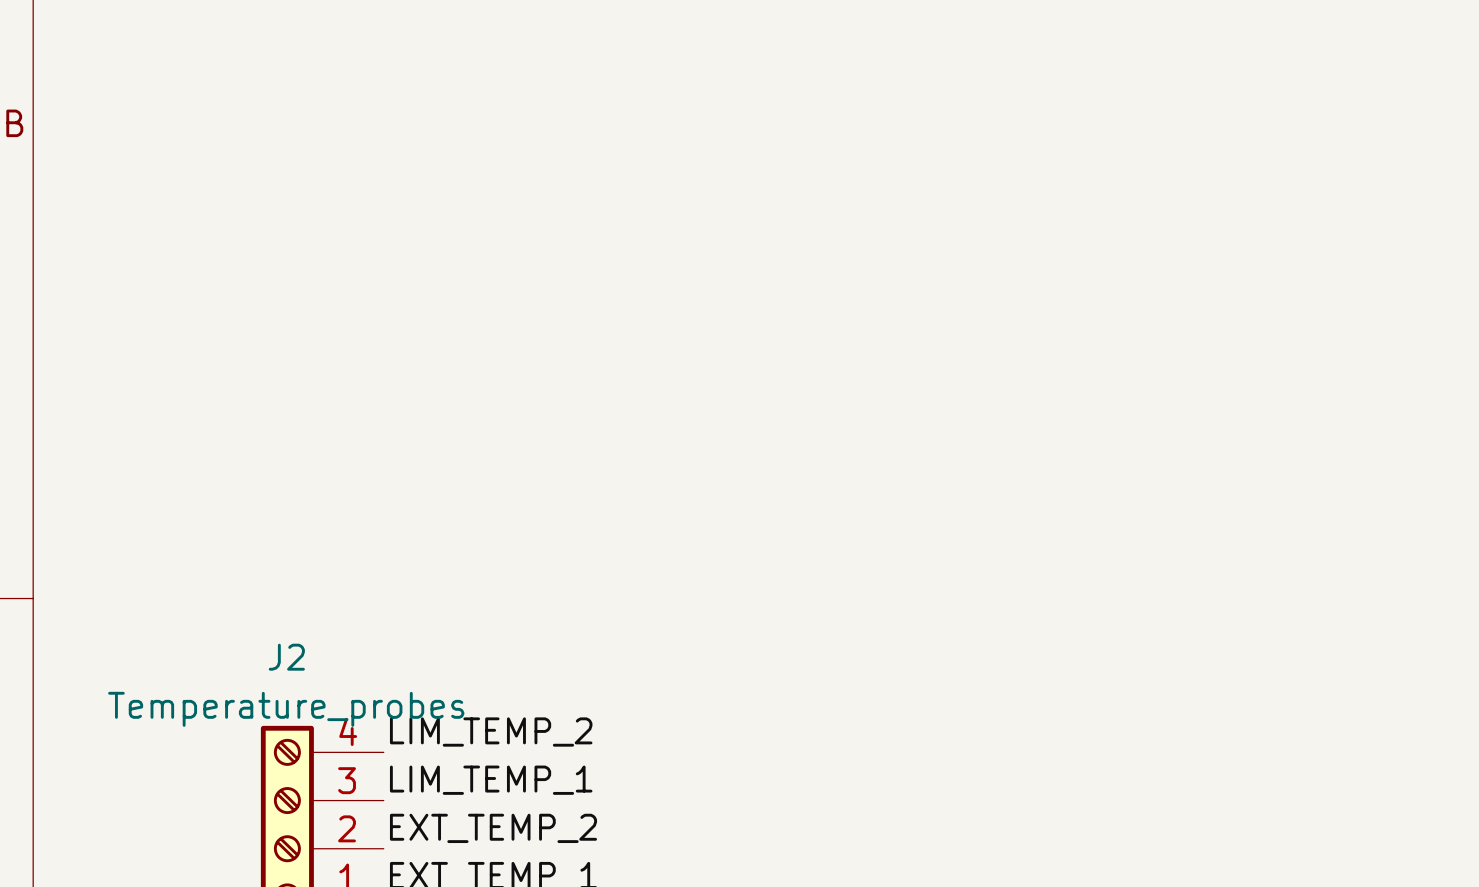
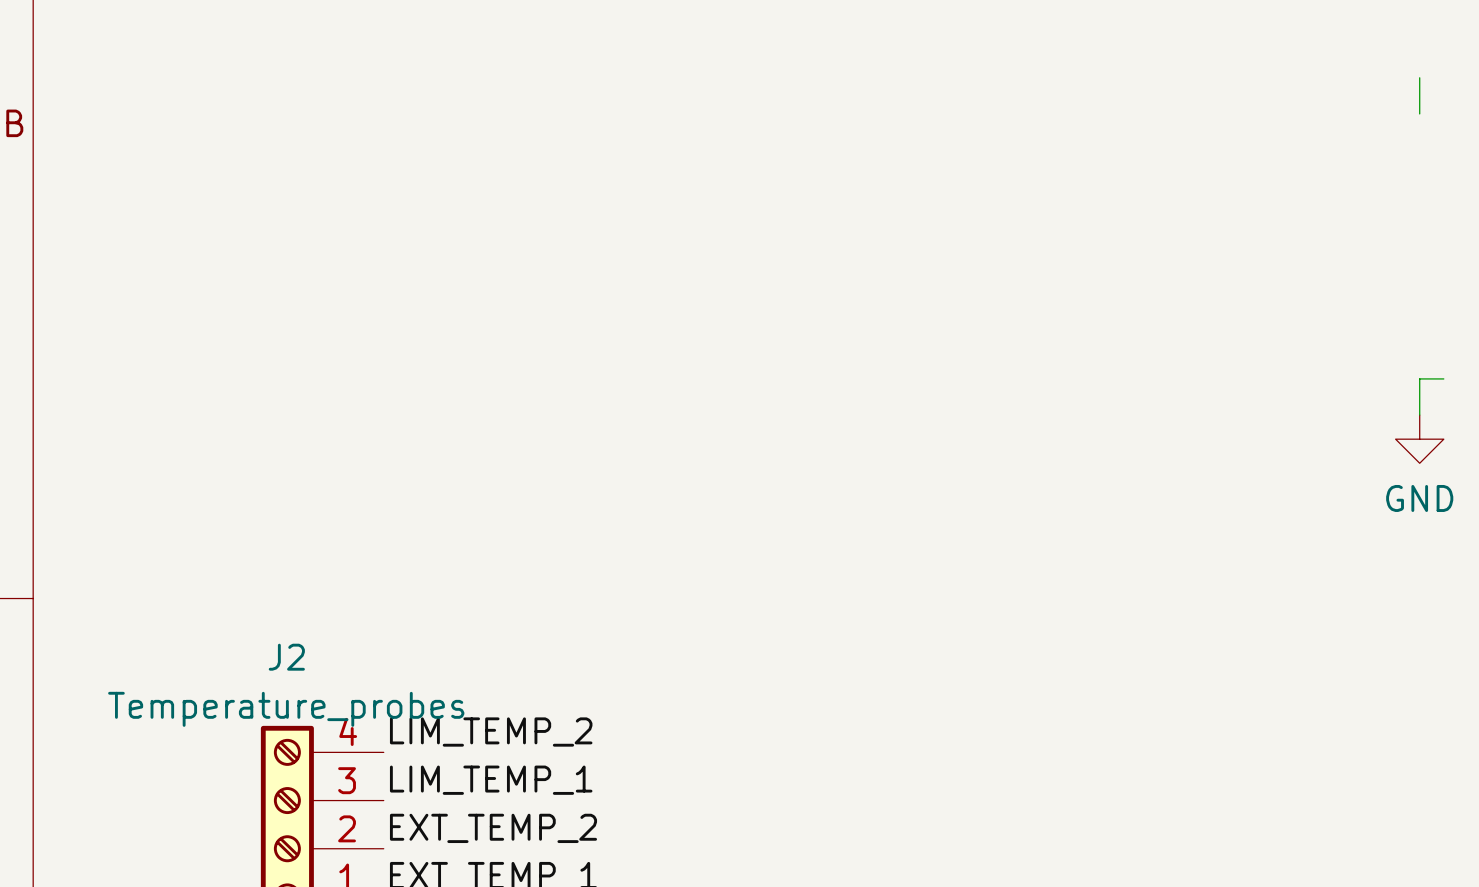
wire: none -> (1419, 77) (1419, 113)
wire: none -> (1443, 378) (1419, 378) (1419, 415)
power symbol: none -> GND (1419, 439)

